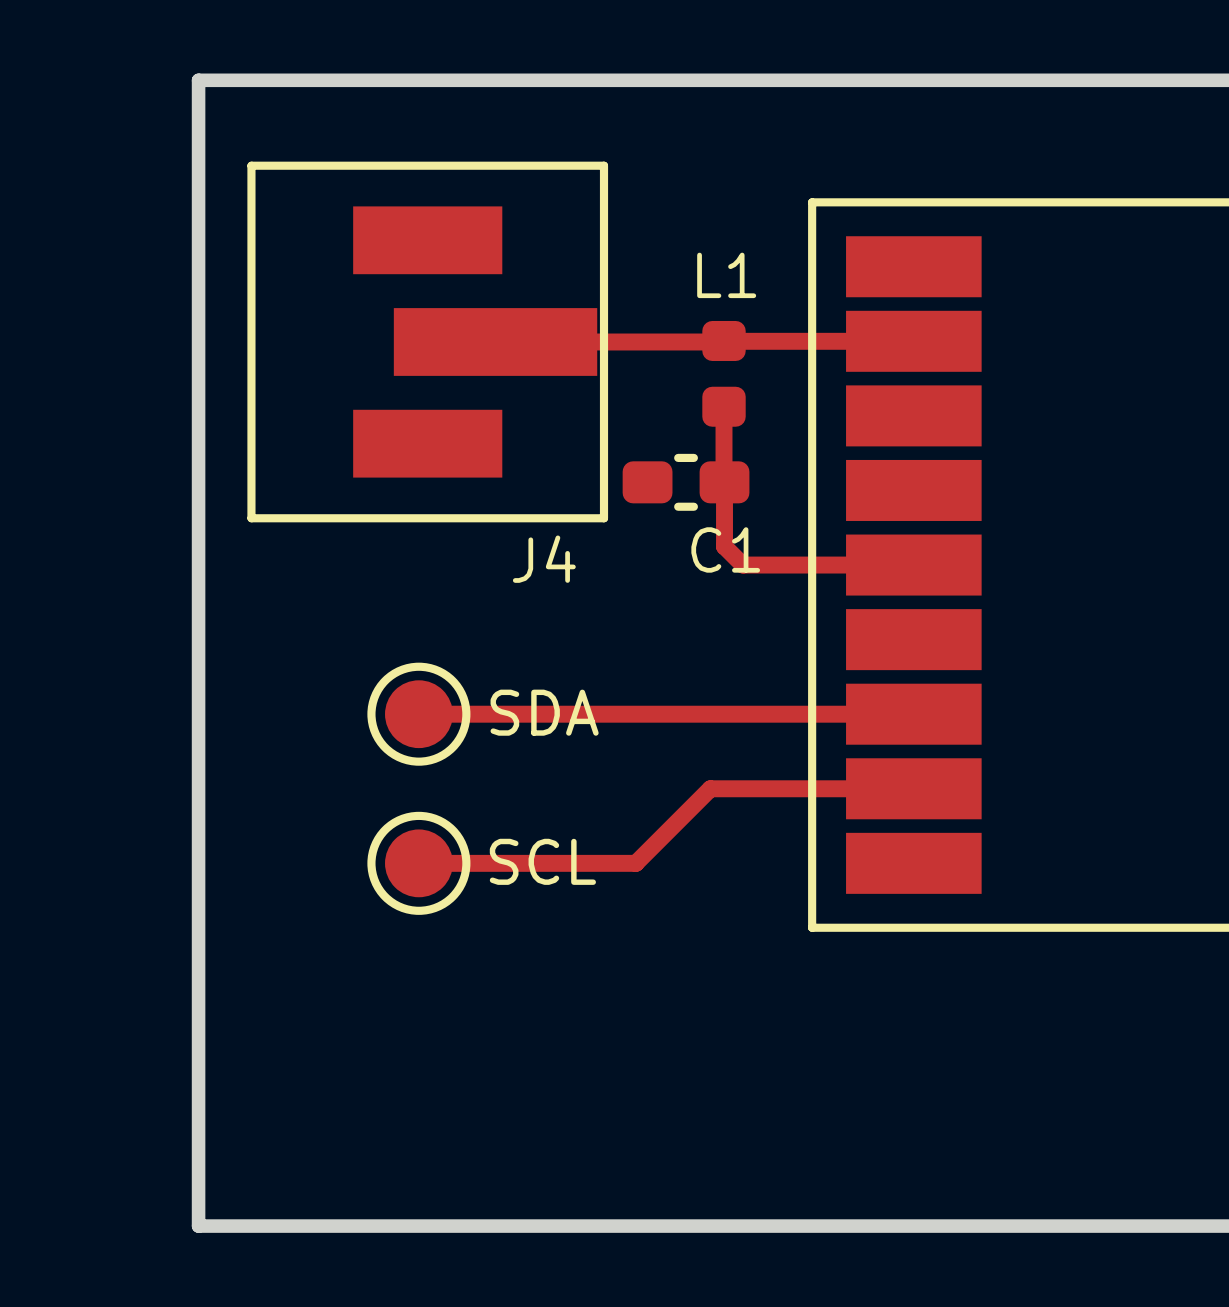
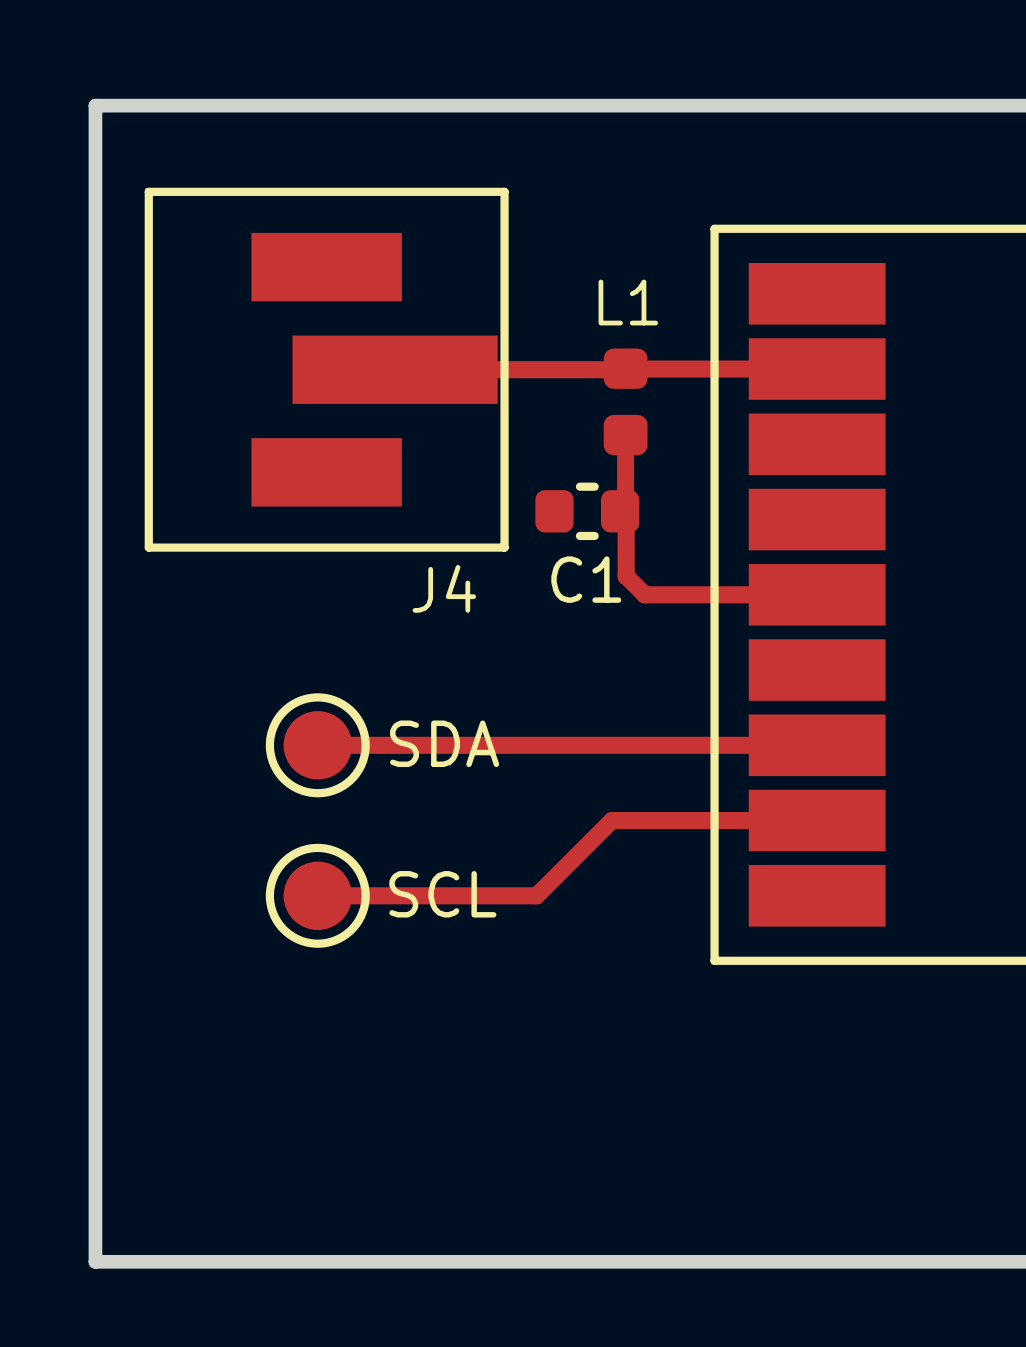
C1 footprint: [622, 453, 750, 511] -> [535, 482, 640, 541]
C1 name position: C1 (725, 549) -> C1 (586, 579)

